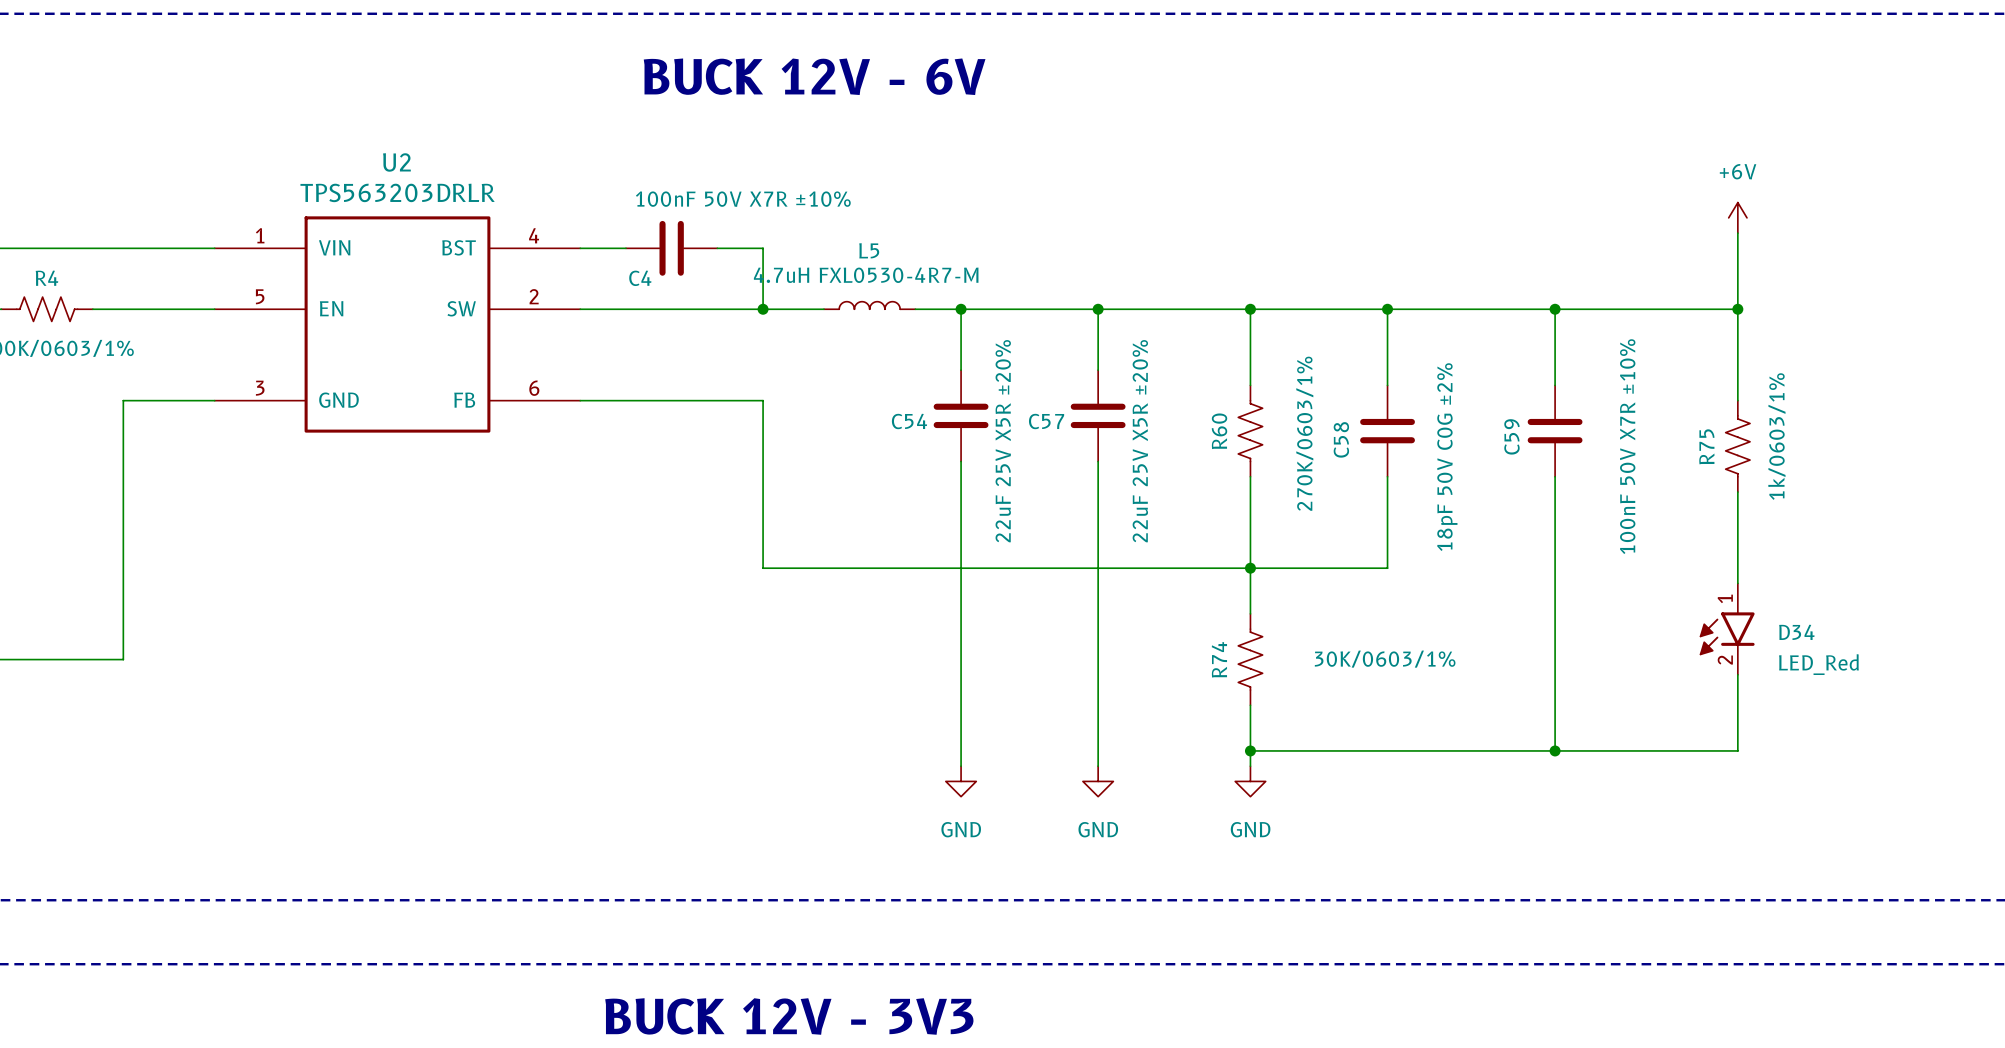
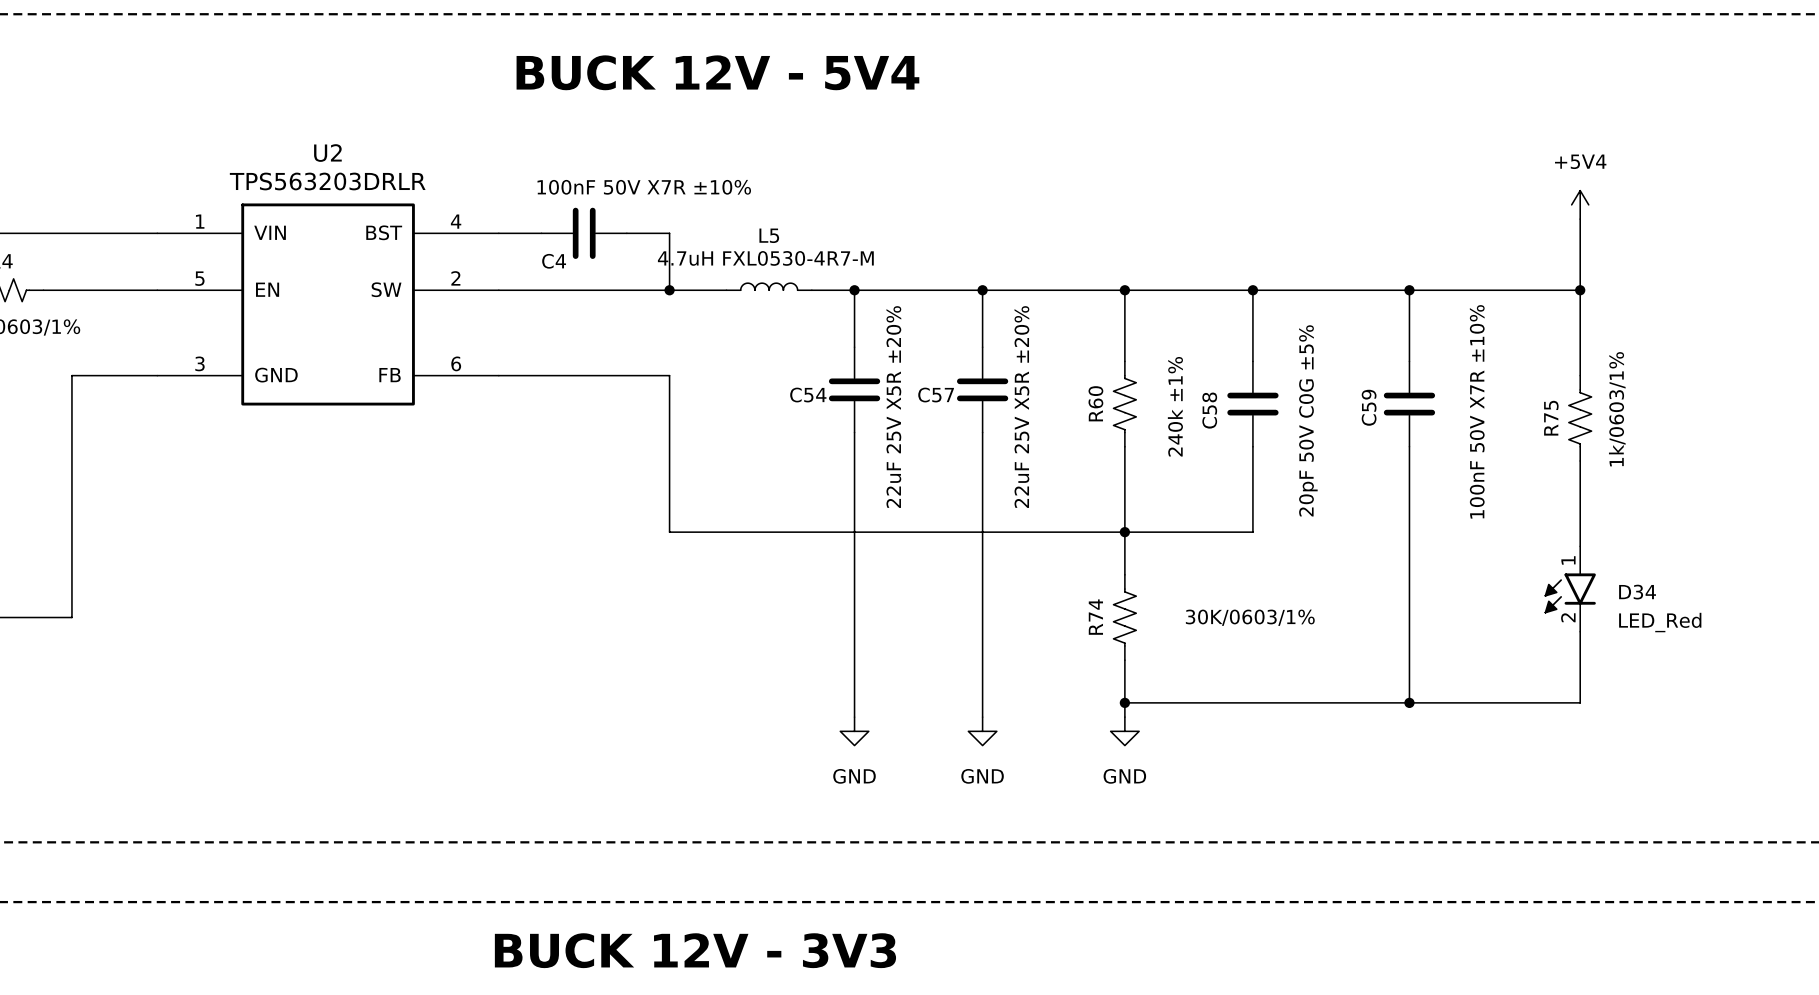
text: BUCK 12V - 6V (814, 76) -> BUCK 12V - 5V4 (717, 72)
power symbol: +6V (1737, 217) -> +5V4 (1580, 204)
R60 value: 270K/0603/1% (1304, 433) -> 240k ±1% (1175, 406)
C58 value: 18pF 50V C0G ±2% (1447, 457) -> 20pF 50V C0G ±5% (1308, 420)

